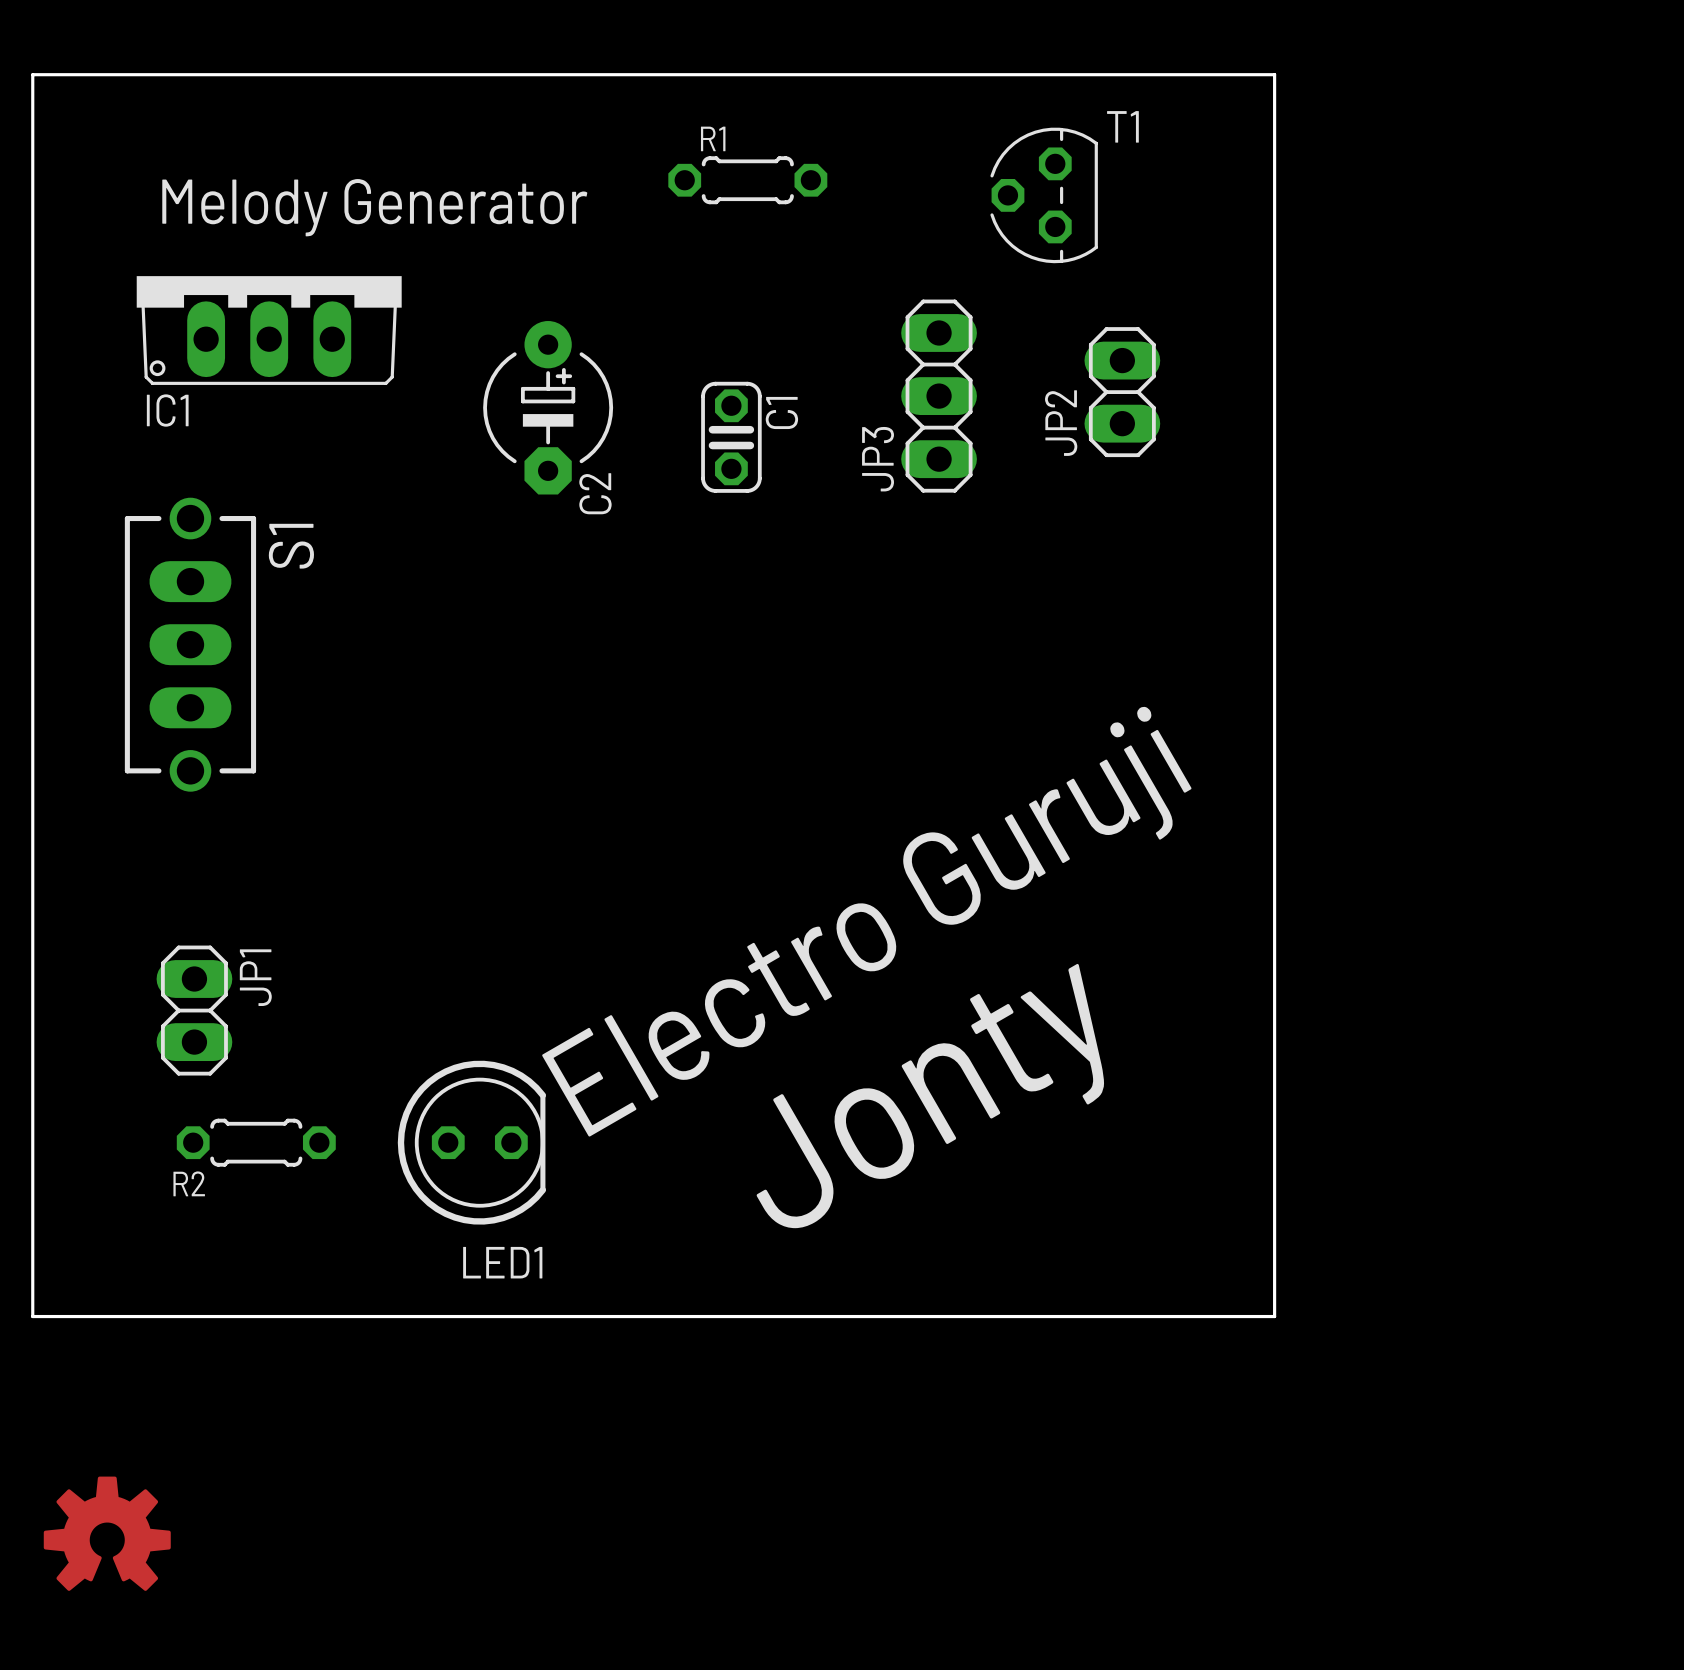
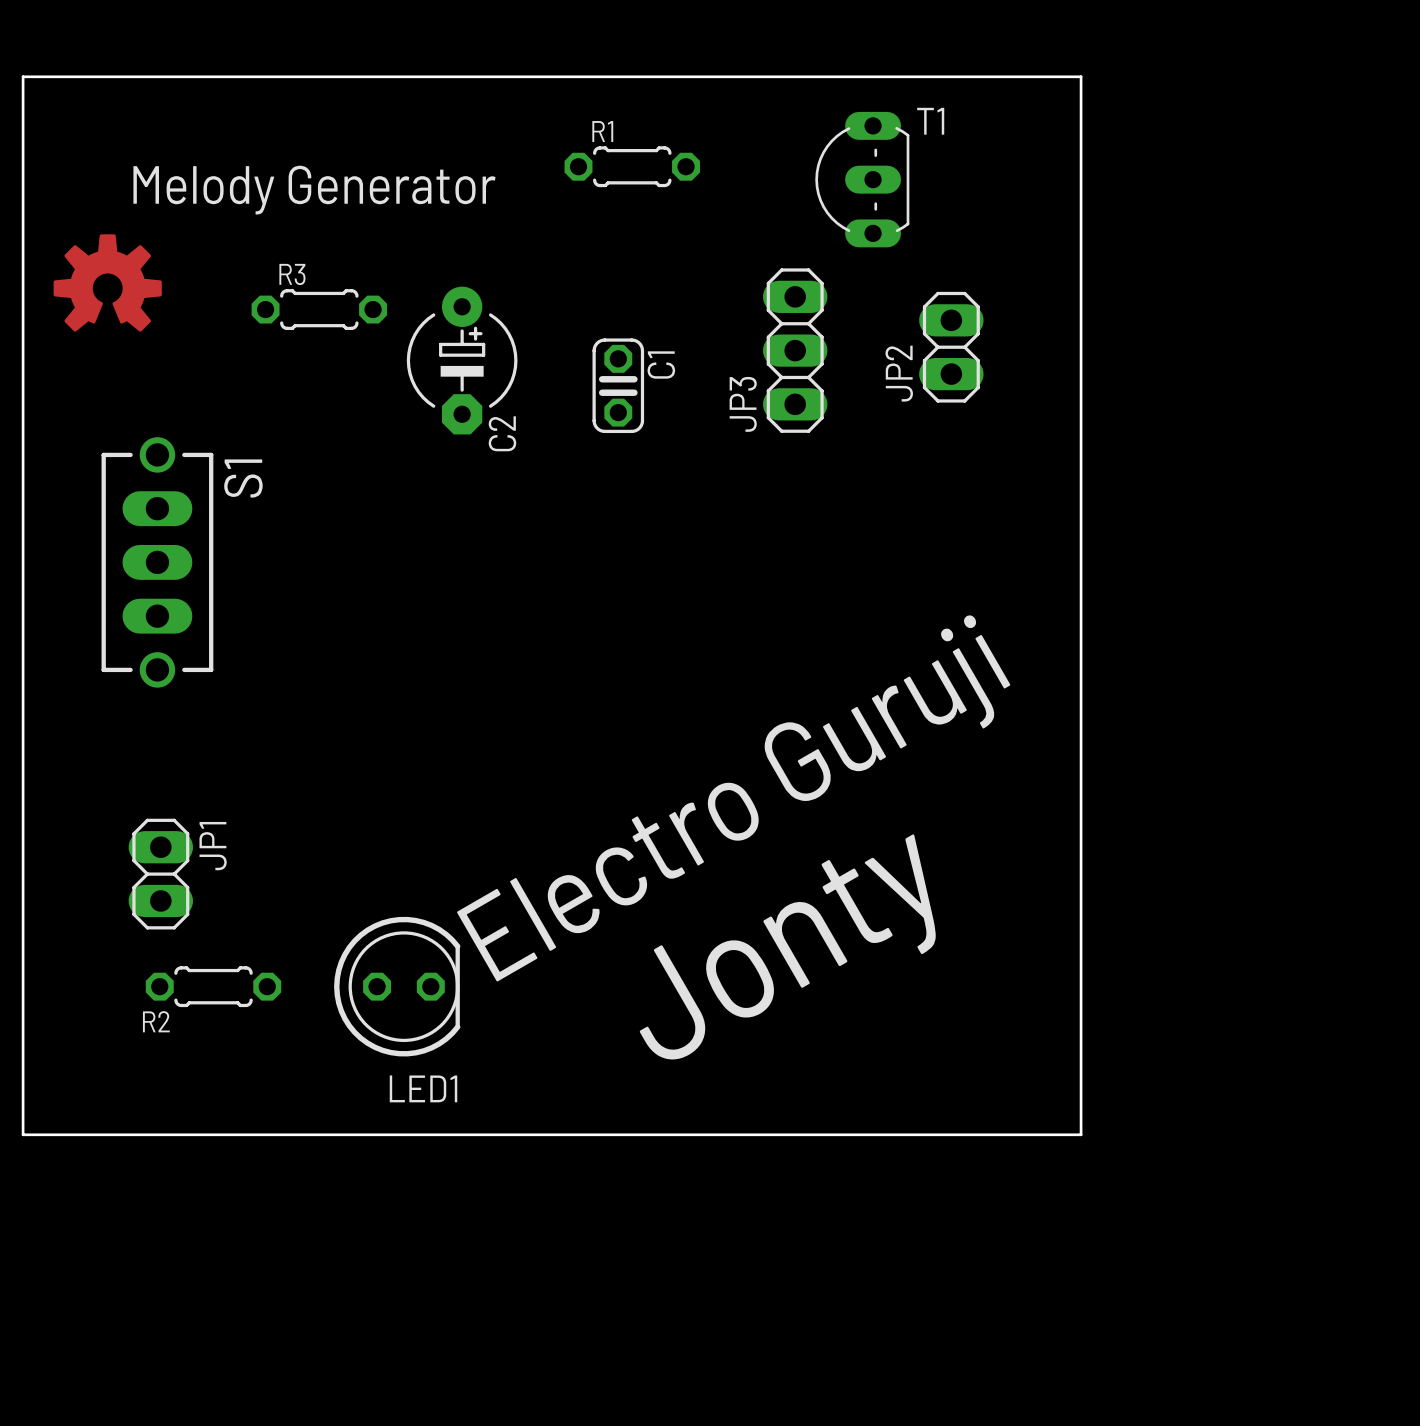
T1 footprint: [990, 127, 1098, 264] -> [815, 111, 910, 248]
drawing: none -> [53, 234, 162, 332]
IC1: (269, 330) -> none
R3: none -> (319, 309)
drawing: [43, 1476, 171, 1591] -> none

